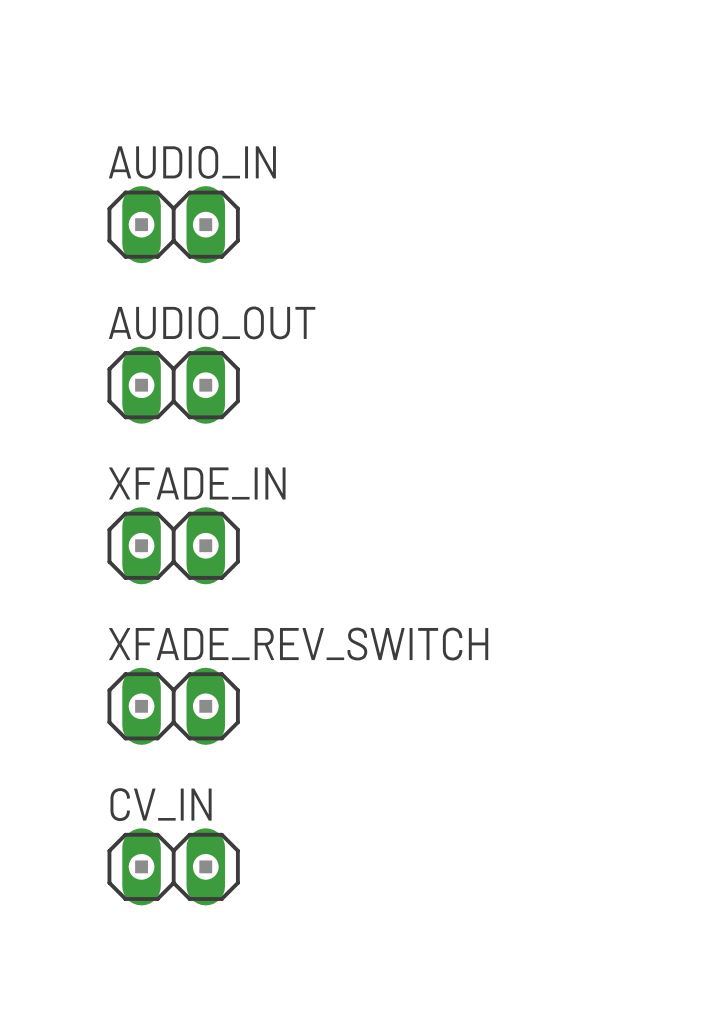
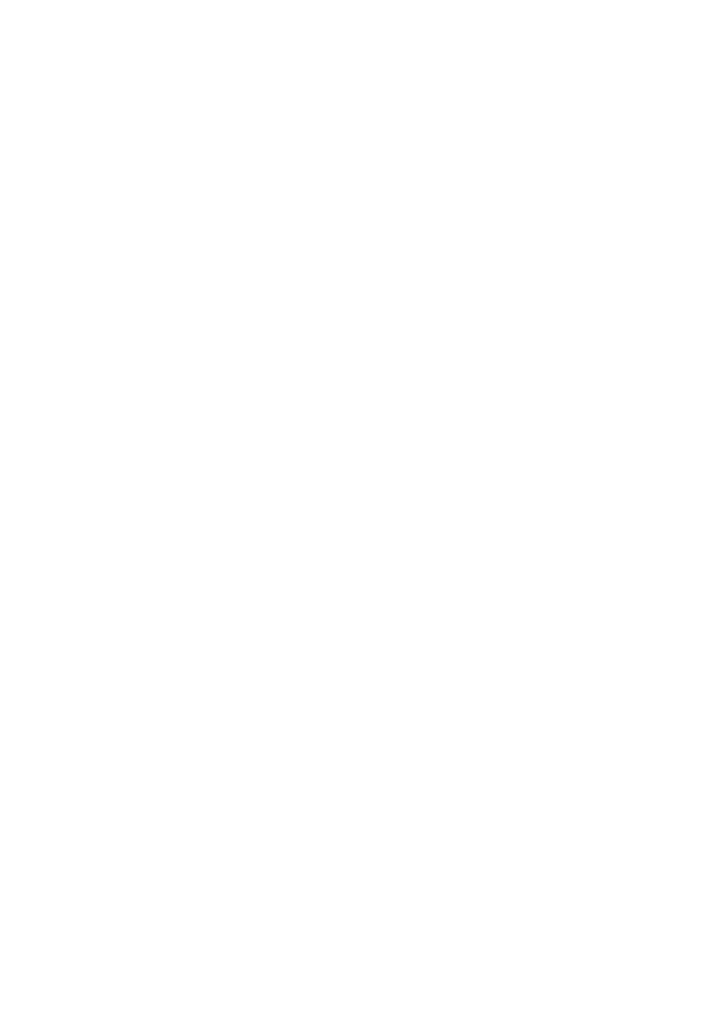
AUDIO_IN: (173, 224) -> none
AUDIO_OUT: (173, 385) -> none
XFADE_IN: (173, 545) -> none
XFADE_REV_SWITCH: (173, 706) -> none
CV_IN: (173, 866) -> none

